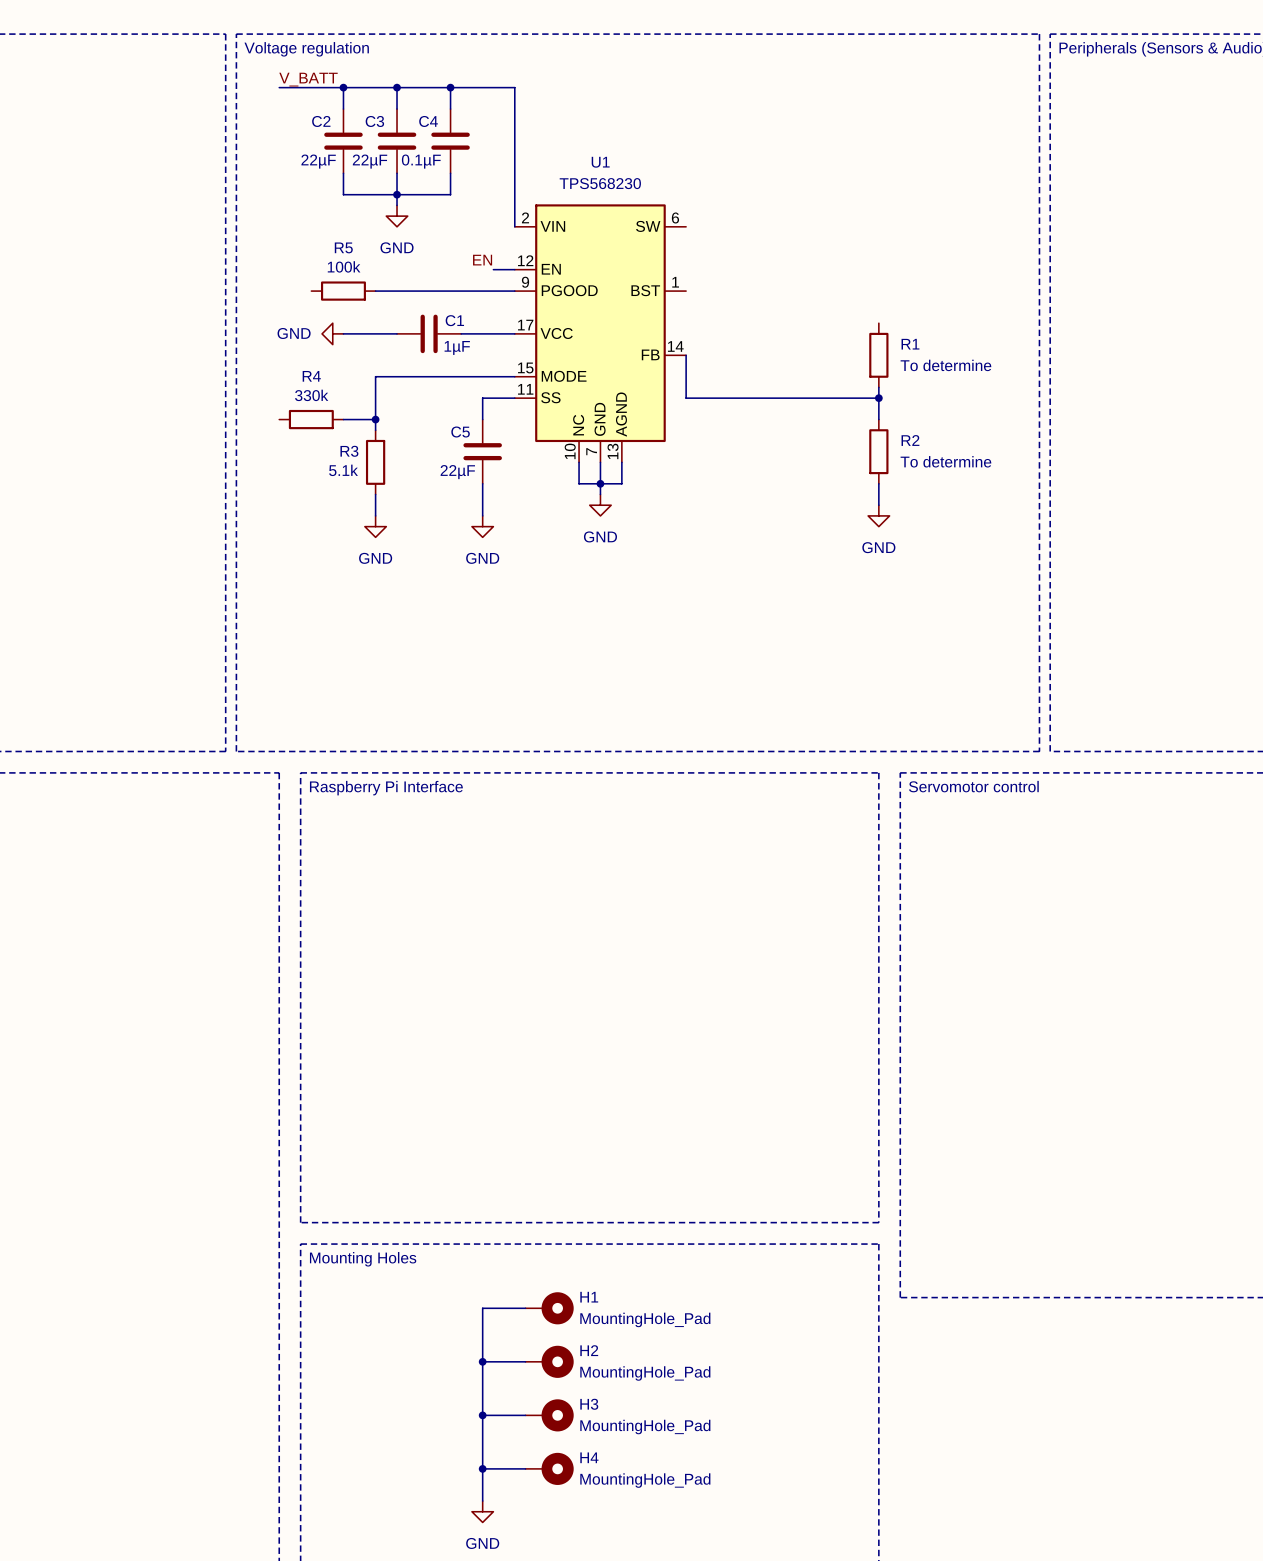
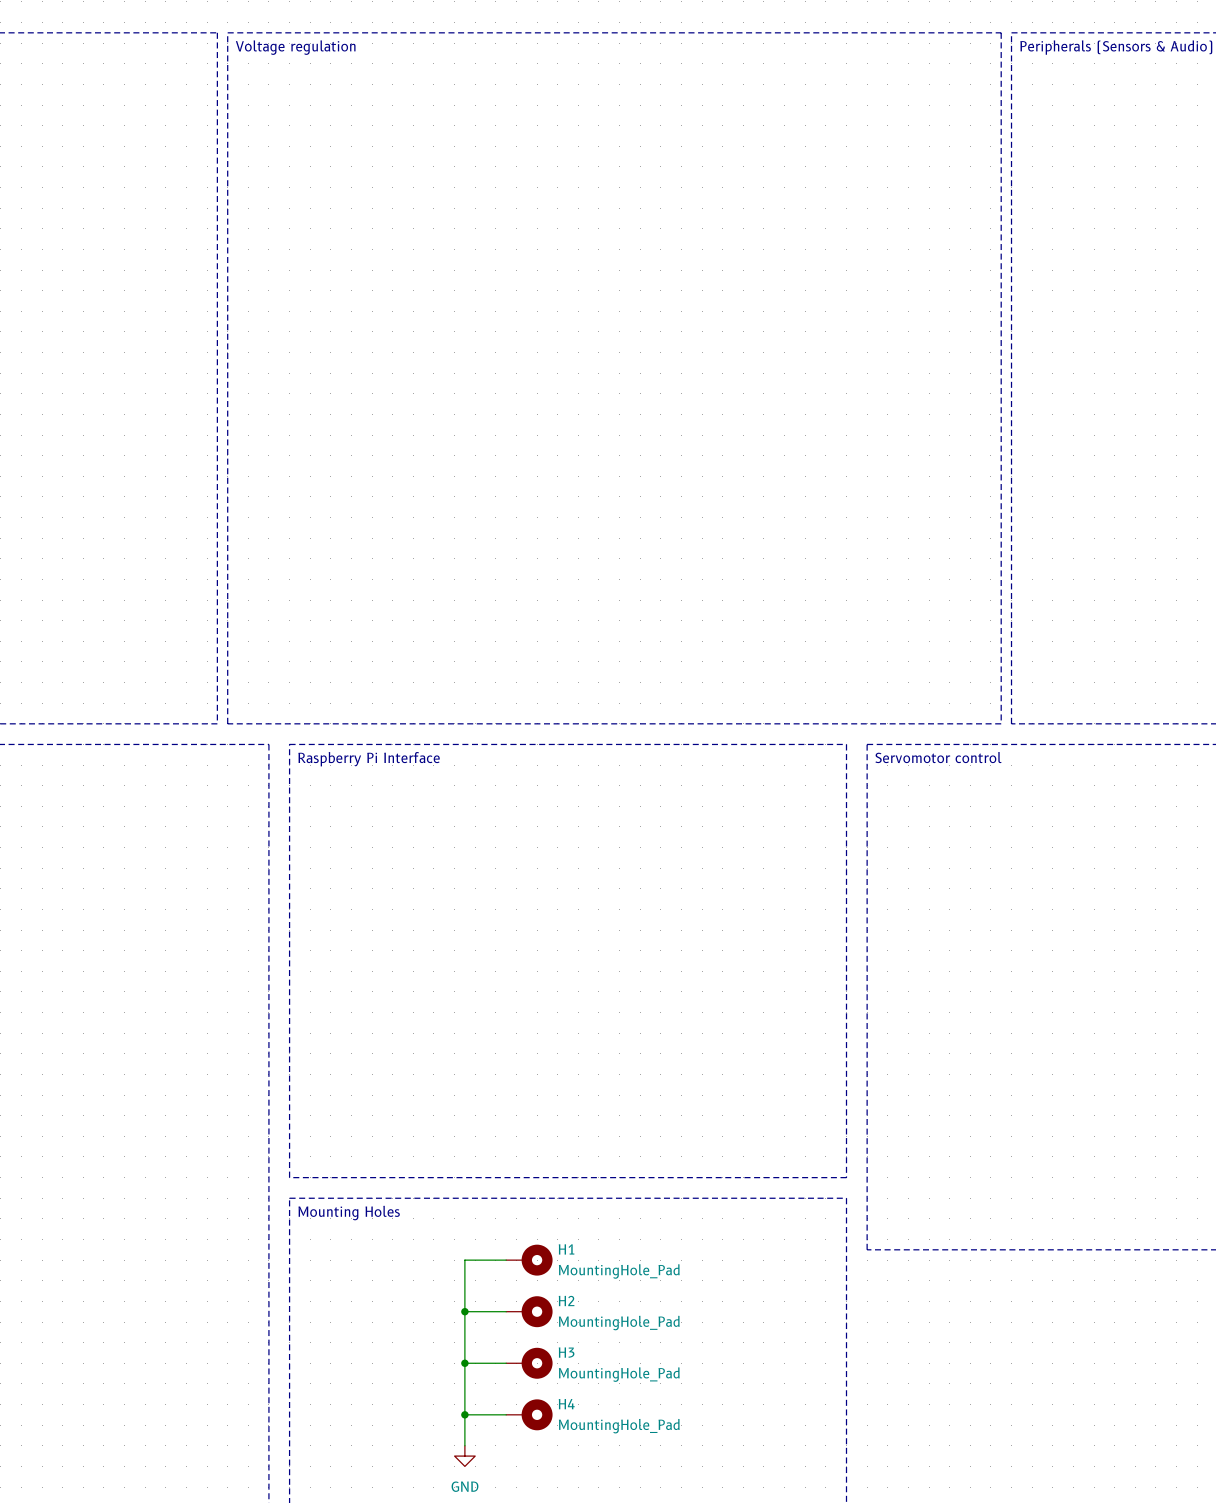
label: V_BATT (308, 79) -> none
wire: (279, 87) (514, 87) (514, 226) -> none
wire: (343, 87) (343, 109) -> none
junction: (343, 87) -> none
wire: (397, 87) (397, 109) -> none
junction: (397, 87) -> none
wire: (450, 87) (450, 109) -> none
junction: (450, 87) -> none
C2: 22µF (343, 141) -> none
C3: 22µF (397, 141) -> none
C4: 0.1µF (450, 141) -> none
wire: (343, 173) (343, 194) (450, 194) (450, 173) -> none
wire: (397, 173) (397, 205) -> none
junction: (397, 194) -> none
power symbol: GND (397, 216) -> none
label: EN (482, 260) -> none
wire: (493, 269) (514, 269) -> none
R5: 100k (343, 291) -> none
wire: (375, 291) (514, 291) -> none
power symbol: GND (332, 333) -> none
wire: (343, 333) (397, 333) -> none
C1: 1µF (429, 333) -> none
wire: (461, 333) (514, 333) -> none
U1: TPS568230 (600, 333) -> none
wire: (686, 355) (686, 398) (878, 398) -> none
R1: To determine (878, 355) -> none
wire: (514, 376) (375, 376) (375, 430) -> none
wire: (878, 387) (878, 419) -> none
wire: (514, 398) (482, 398) (482, 419) -> none
junction: (878, 398) -> none
R4: 330k (311, 419) -> none
wire: (343, 419) (375, 419) -> none
junction: (375, 419) -> none
C5: 22µF (482, 451) -> none
R2: To determine (878, 451) -> none
R3: 5.1k (375, 462) -> none
wire: (579, 462) (579, 483) (621, 483) (621, 462) -> none
wire: (600, 462) (600, 494) -> none
wire: (482, 483) (482, 515) -> none
junction: (600, 483) -> none
wire: (878, 483) (878, 505) -> none
wire: (375, 494) (375, 515) -> none
power symbol: GND (600, 505) -> none
power symbol: GND (878, 515) -> none
power symbol: GND (375, 526) -> none
power symbol: GND (482, 526) -> none

